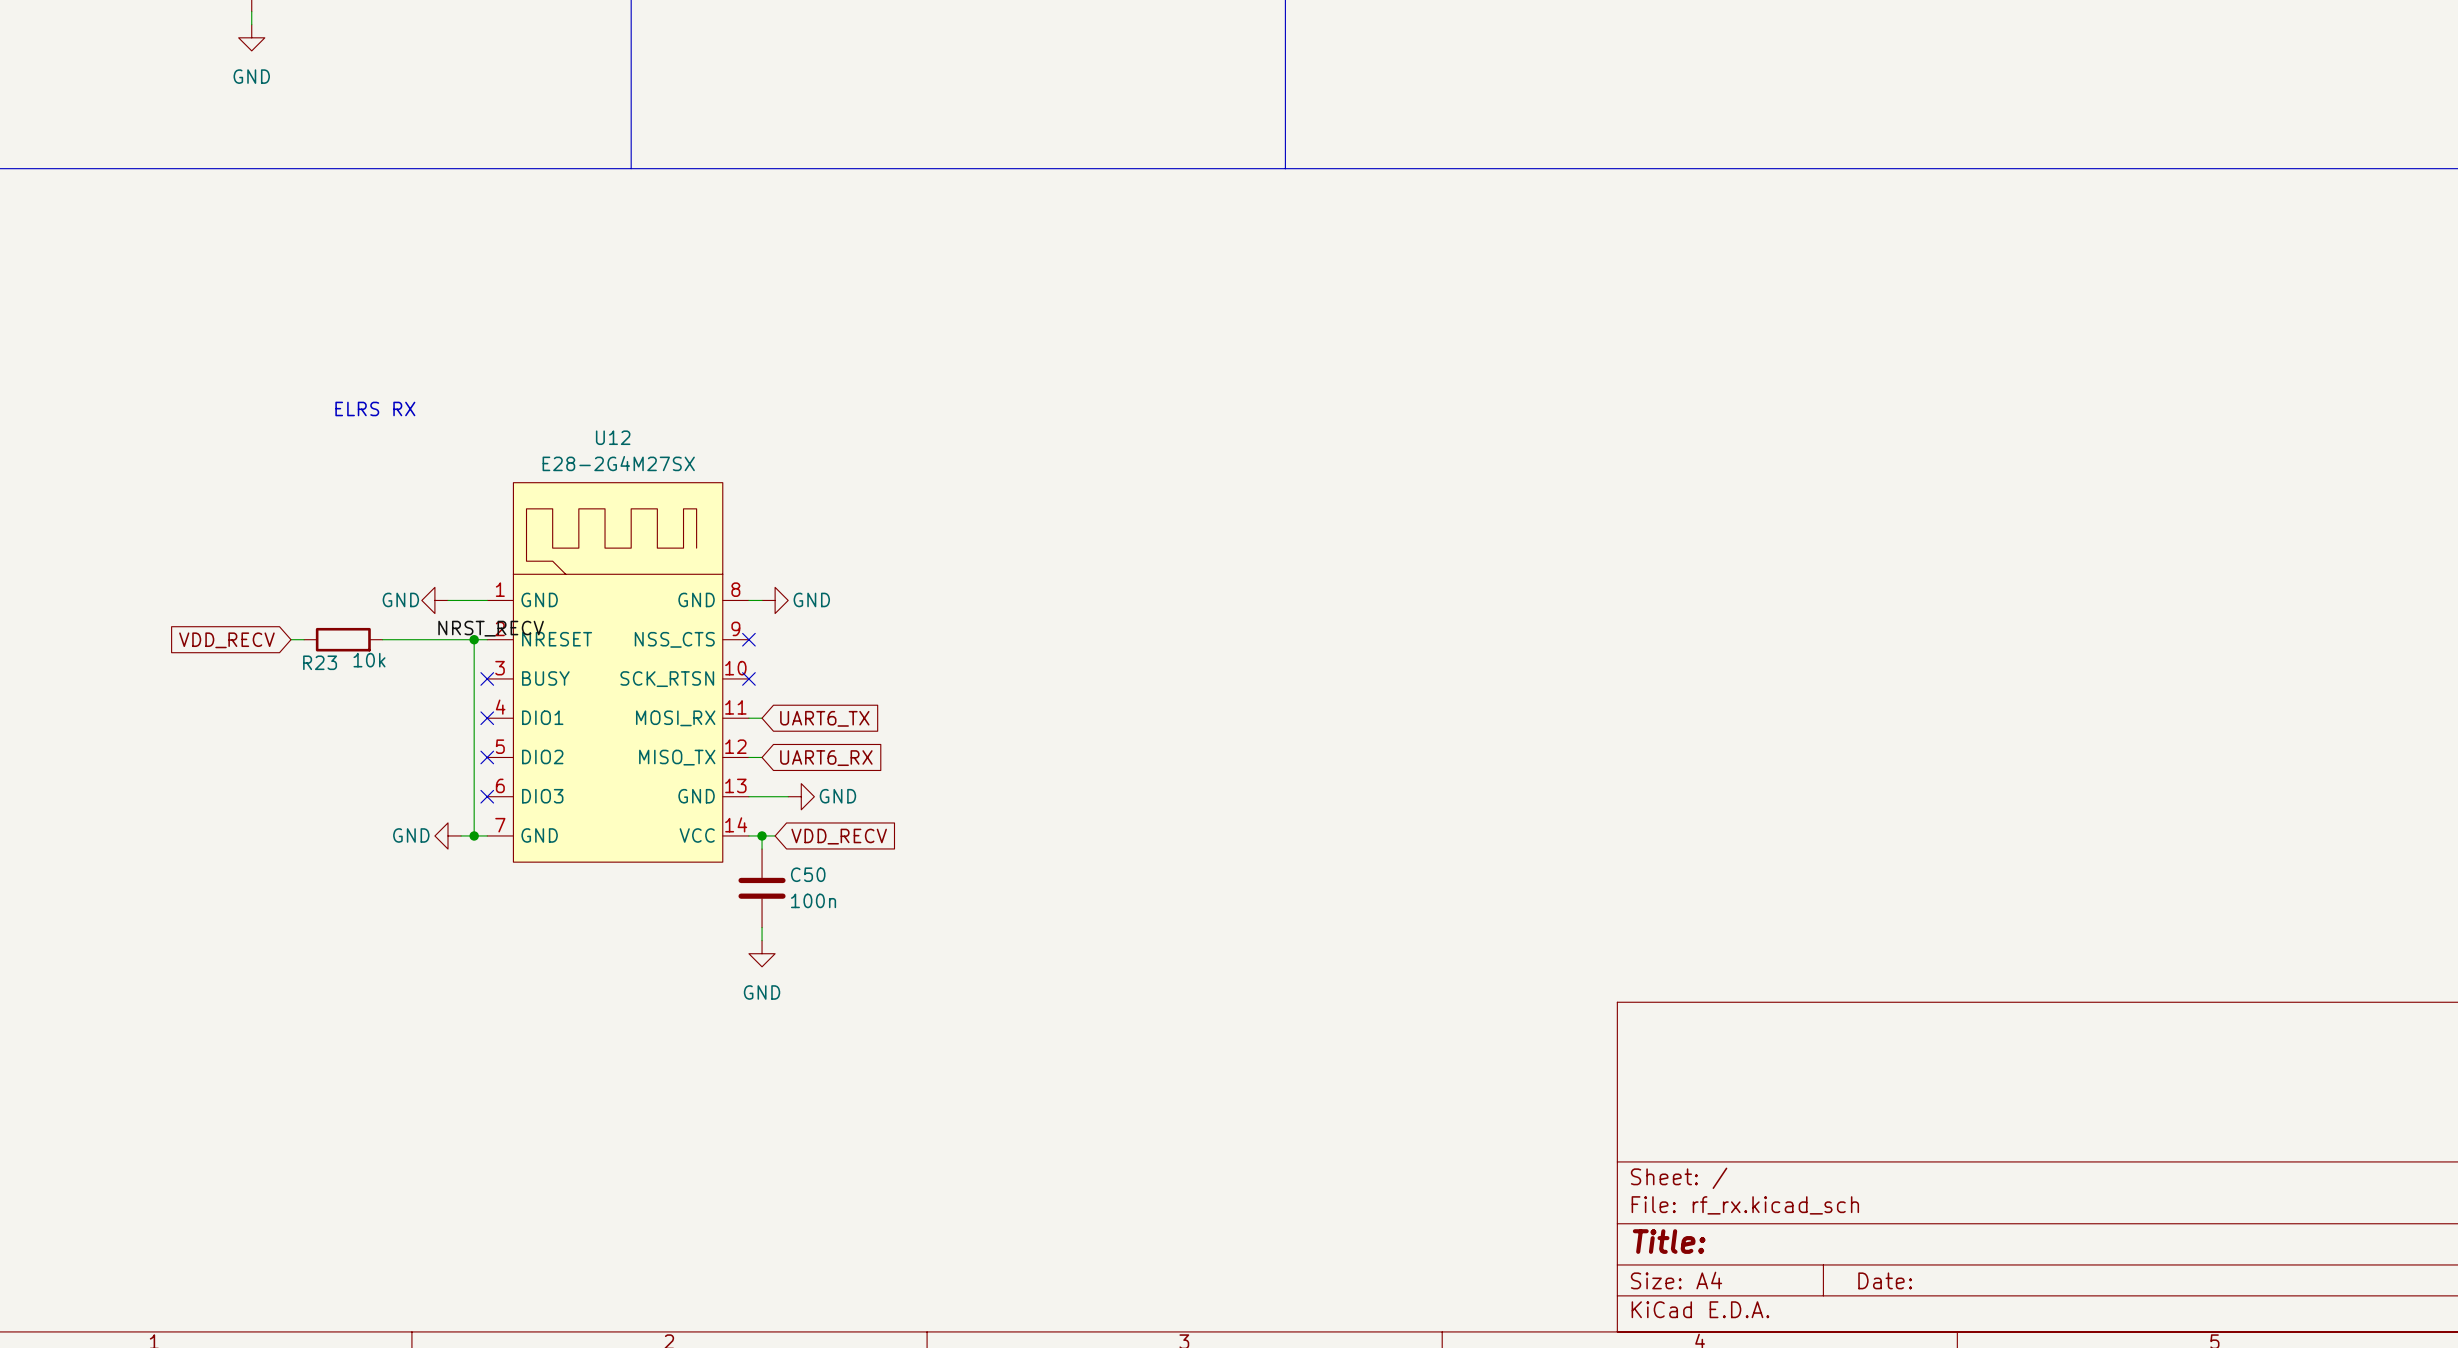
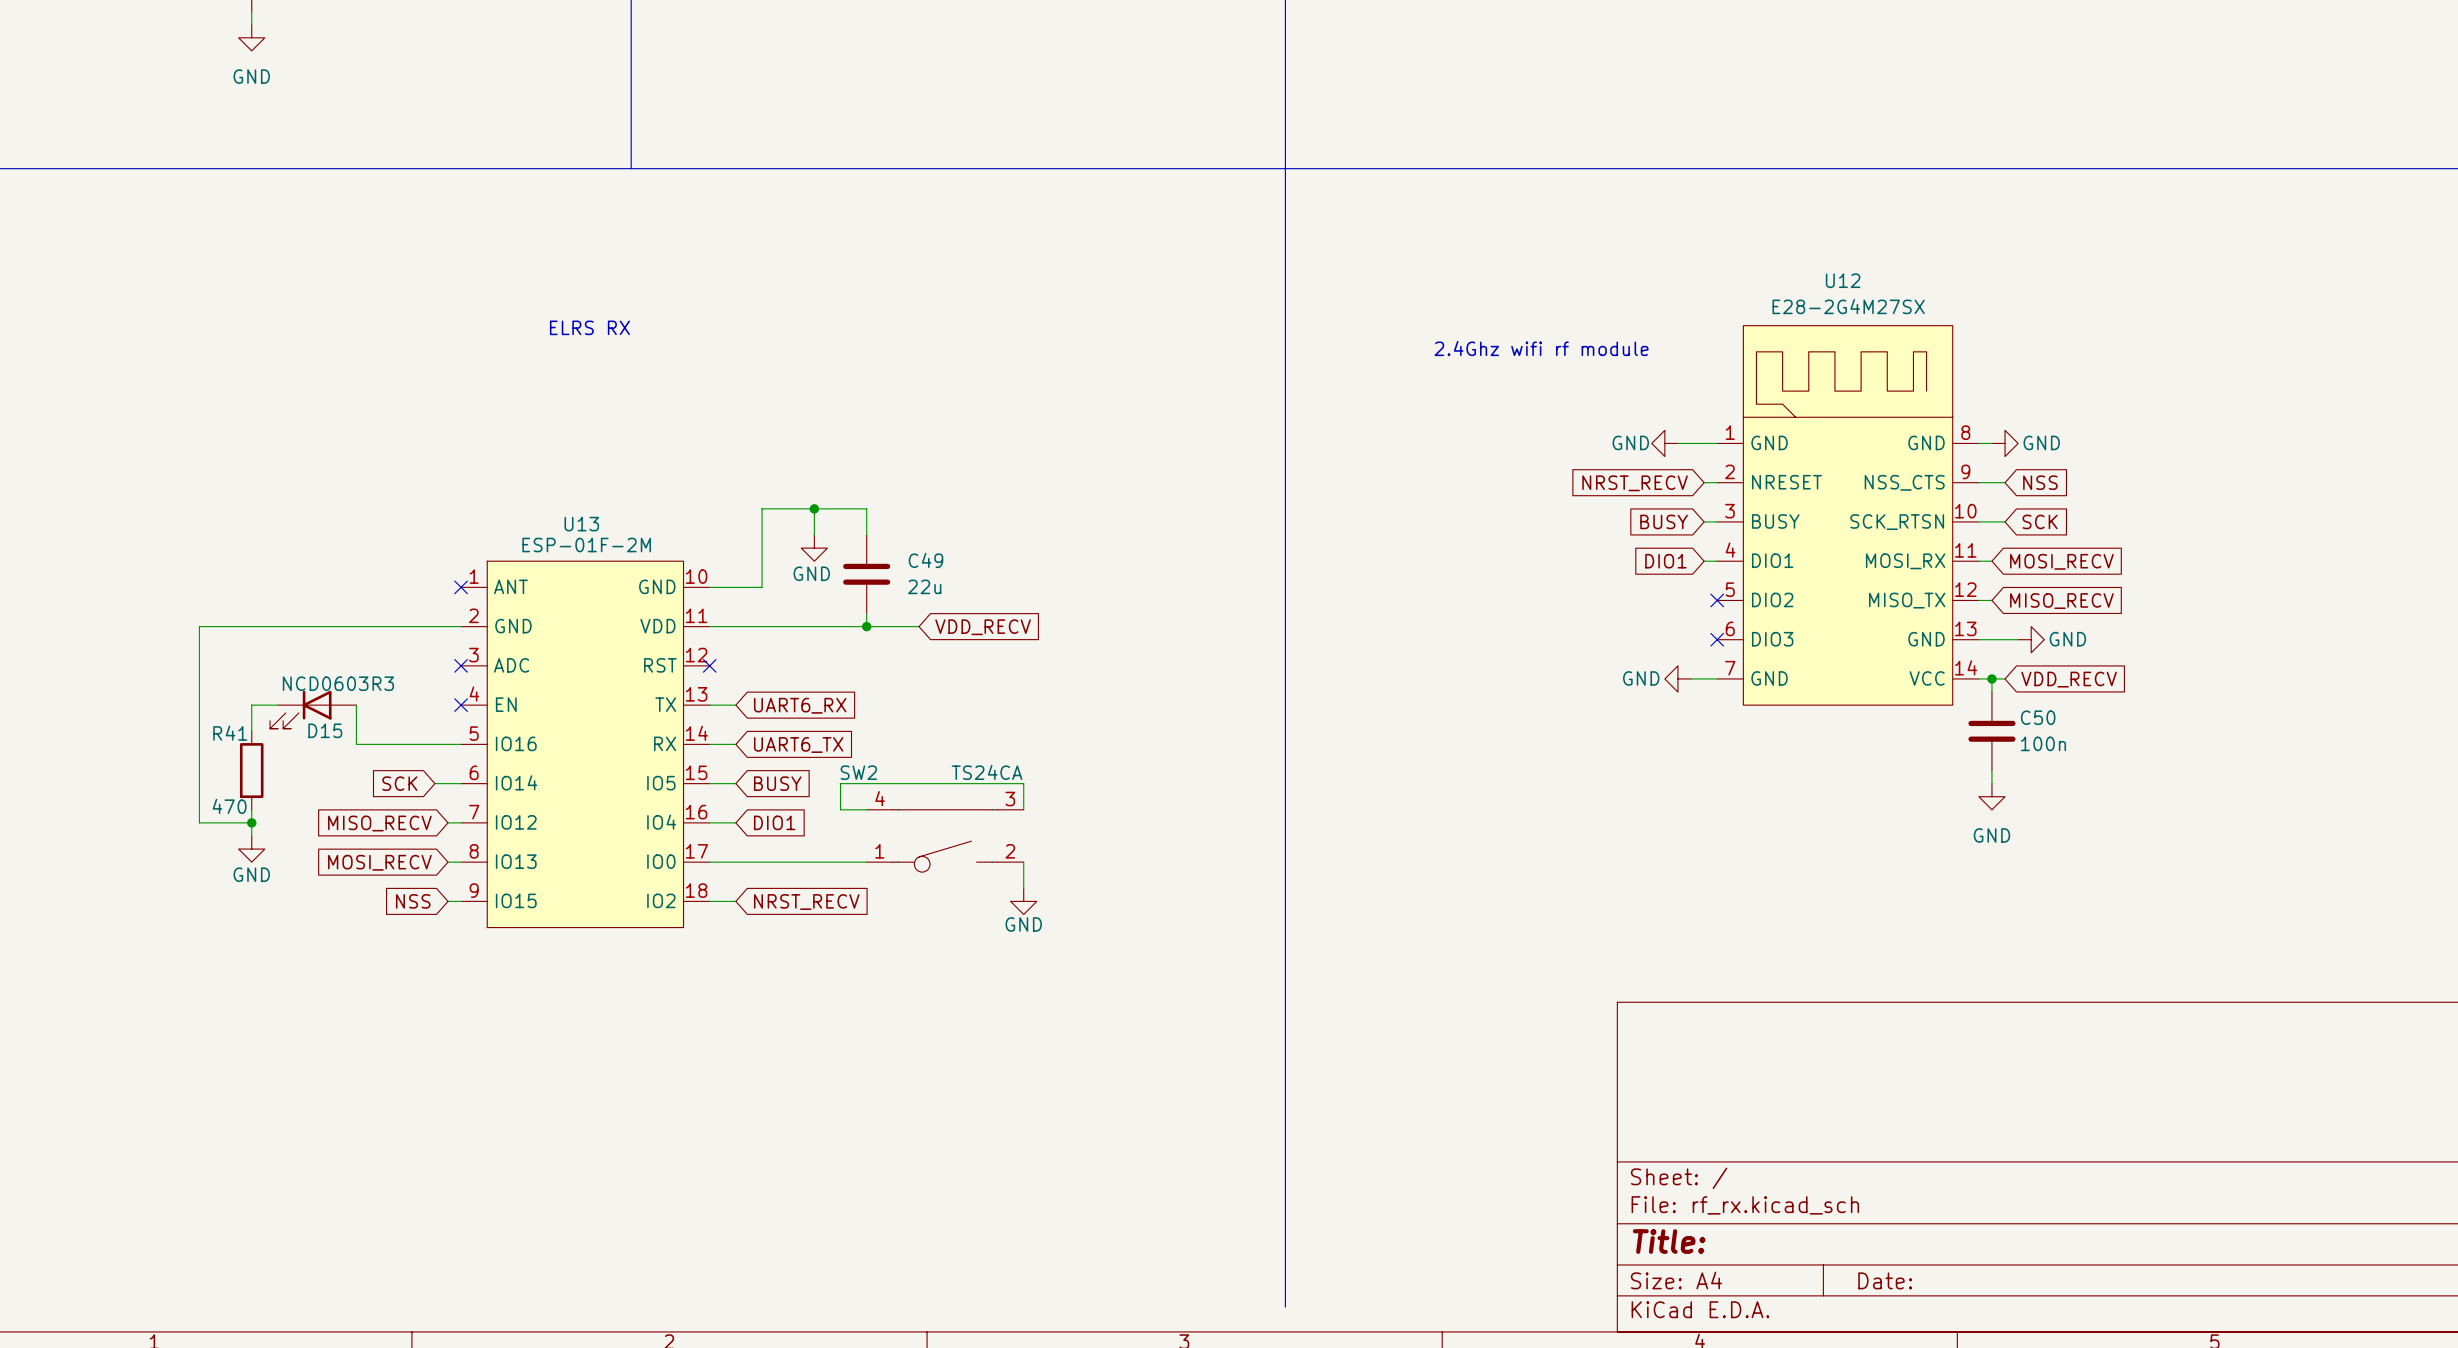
line: none -> (1285, 168) (1285, 1307)
text: none -> 2.4Ghz wifi rf module (1541, 348)
text position: ELRS RX (375, 408) -> ELRS RX (589, 327)
power symbol: none -> GND (1664, 443)
wire: none -> (1677, 443) (1717, 443)
wire: none -> (1978, 443) (1991, 443)
power symbol: none -> GND (2005, 443)
wire: none -> (1704, 482) (1717, 482)
wire: none -> (1978, 482) (2005, 482)
global label: none -> NSS (2040, 482)
global label: none -> NRST_RECV (1635, 483)
wire: none -> (814, 508) (814, 535)
junction: none -> (814, 508)
global label: none -> BUSY (1664, 521)
wire: none -> (1704, 521) (1717, 521)
wire: none -> (1978, 521) (2005, 521)
global label: none -> SCK (2040, 521)
wire: none -> (866, 535) (866, 508) (762, 508) (762, 587) (709, 587)
global label: none -> DIO1 (1665, 561)
wire: none -> (1704, 561) (1717, 561)
wire: none -> (1978, 561) (1991, 561)
global label: none -> MOSI_RECV (2061, 561)
C49: none -> 22u (866, 574)
no-connect mark: none -> (461, 587)
power symbol: GND (434, 600) -> none
wire: (448, 600) (487, 600) -> none
wire: (748, 600) (762, 600) -> none
power symbol rotation: 0° (775, 600) -> 90° clockwise (814, 548)
power symbol position: GND (775, 600) -> GND (814, 548)
no-connect mark: none -> (1717, 600)
wire: none -> (1978, 600) (1991, 600)
global label: none -> MISO_RECV (2061, 601)
wire: none -> (461, 626) (199, 626) (199, 822) (251, 822)
wire: none -> (709, 626) (919, 626)
junction: none -> (866, 626)
label: NRST_RECV (491, 628) -> none
wire: (290, 639) (304, 639) -> (448, 822) (461, 822)
R23: 10k (343, 639) -> none
wire: (382, 639) (487, 639) -> none
wire: (474, 639) (474, 835) -> none
junction: (474, 639) -> none
no-connect mark: (748, 639) -> none
no-connect mark: none -> (1717, 639)
wire: none -> (1978, 639) (2018, 639)
power symbol: none -> GND (2031, 639)
global label: VDD_RECV (226, 640) -> none
no-connect mark: none -> (461, 665)
no-connect mark: none -> (709, 665)
U12 position: (618, 672) -> (1848, 515)
no-connect mark: (487, 678) -> none
no-connect mark: (748, 678) -> none
power symbol: none -> GND (1677, 678)
wire: none -> (1691, 678) (1717, 678)
wire: none -> (1978, 678) (2005, 678)
wire: none -> (1991, 678) (1991, 692)
junction: none -> (1991, 678)
global label: none -> VDD_RECV (2069, 679)
wire: none -> (277, 705) (251, 705) (251, 731)
wire: none -> (356, 705) (356, 744) (461, 744)
no-connect mark: none -> (461, 705)
D15: none -> NCD0603R3 (313, 709)
no-connect mark: (487, 718) -> none
global label position: UART6_TX (824, 718) -> UART6_TX (798, 745)
U13: none -> ESP-01F-2M (585, 744)
no-connect mark: (487, 757) -> none
global label position: UART6_RX (826, 758) -> UART6_RX (800, 705)
R41: none -> 470 (251, 770)
wire: none -> (1991, 770) (1991, 783)
global label: none -> SCK (399, 783)
global label: none -> BUSY (777, 783)
no-connect mark: (487, 796) -> none
power symbol: GND (801, 796) -> none
power symbol: none -> GND (1991, 796)
wire: none -> (251, 809) (251, 835)
wire: none -> (866, 809) (840, 809) (840, 783) (1023, 783) (1023, 809)
junction: none -> (251, 822)
global label: none -> DIO1 (774, 822)
global label: none -> MISO_RECV (379, 823)
power symbol: GND (448, 835) -> none
wire: (461, 835) (487, 835) -> (434, 783) (461, 783)
junction: (474, 835) -> none
wire: (762, 835) (762, 849) -> (866, 613) (866, 626)
junction: (762, 835) -> none
global label position: VDD_RECV (839, 836) -> VDD_RECV (983, 627)
SW2: none -> TS24CA (945, 840)
power symbol: none -> GND (251, 849)
global label: none -> MOSI_RECV (379, 862)
wire: none -> (448, 862) (461, 862)
wire: none -> (709, 862) (866, 862)
wire: none -> (1023, 862) (1023, 888)
C50 position: (762, 888) -> (1991, 731)
global label: none -> NSS (413, 901)
wire: none -> (448, 901) (461, 901)
wire: none -> (709, 901) (735, 901)
power symbol: none -> GND (1023, 901)
global label: none -> NRST_RECV (806, 902)
wire: (762, 927) (762, 940) -> none
power symbol: GND (762, 953) -> none

